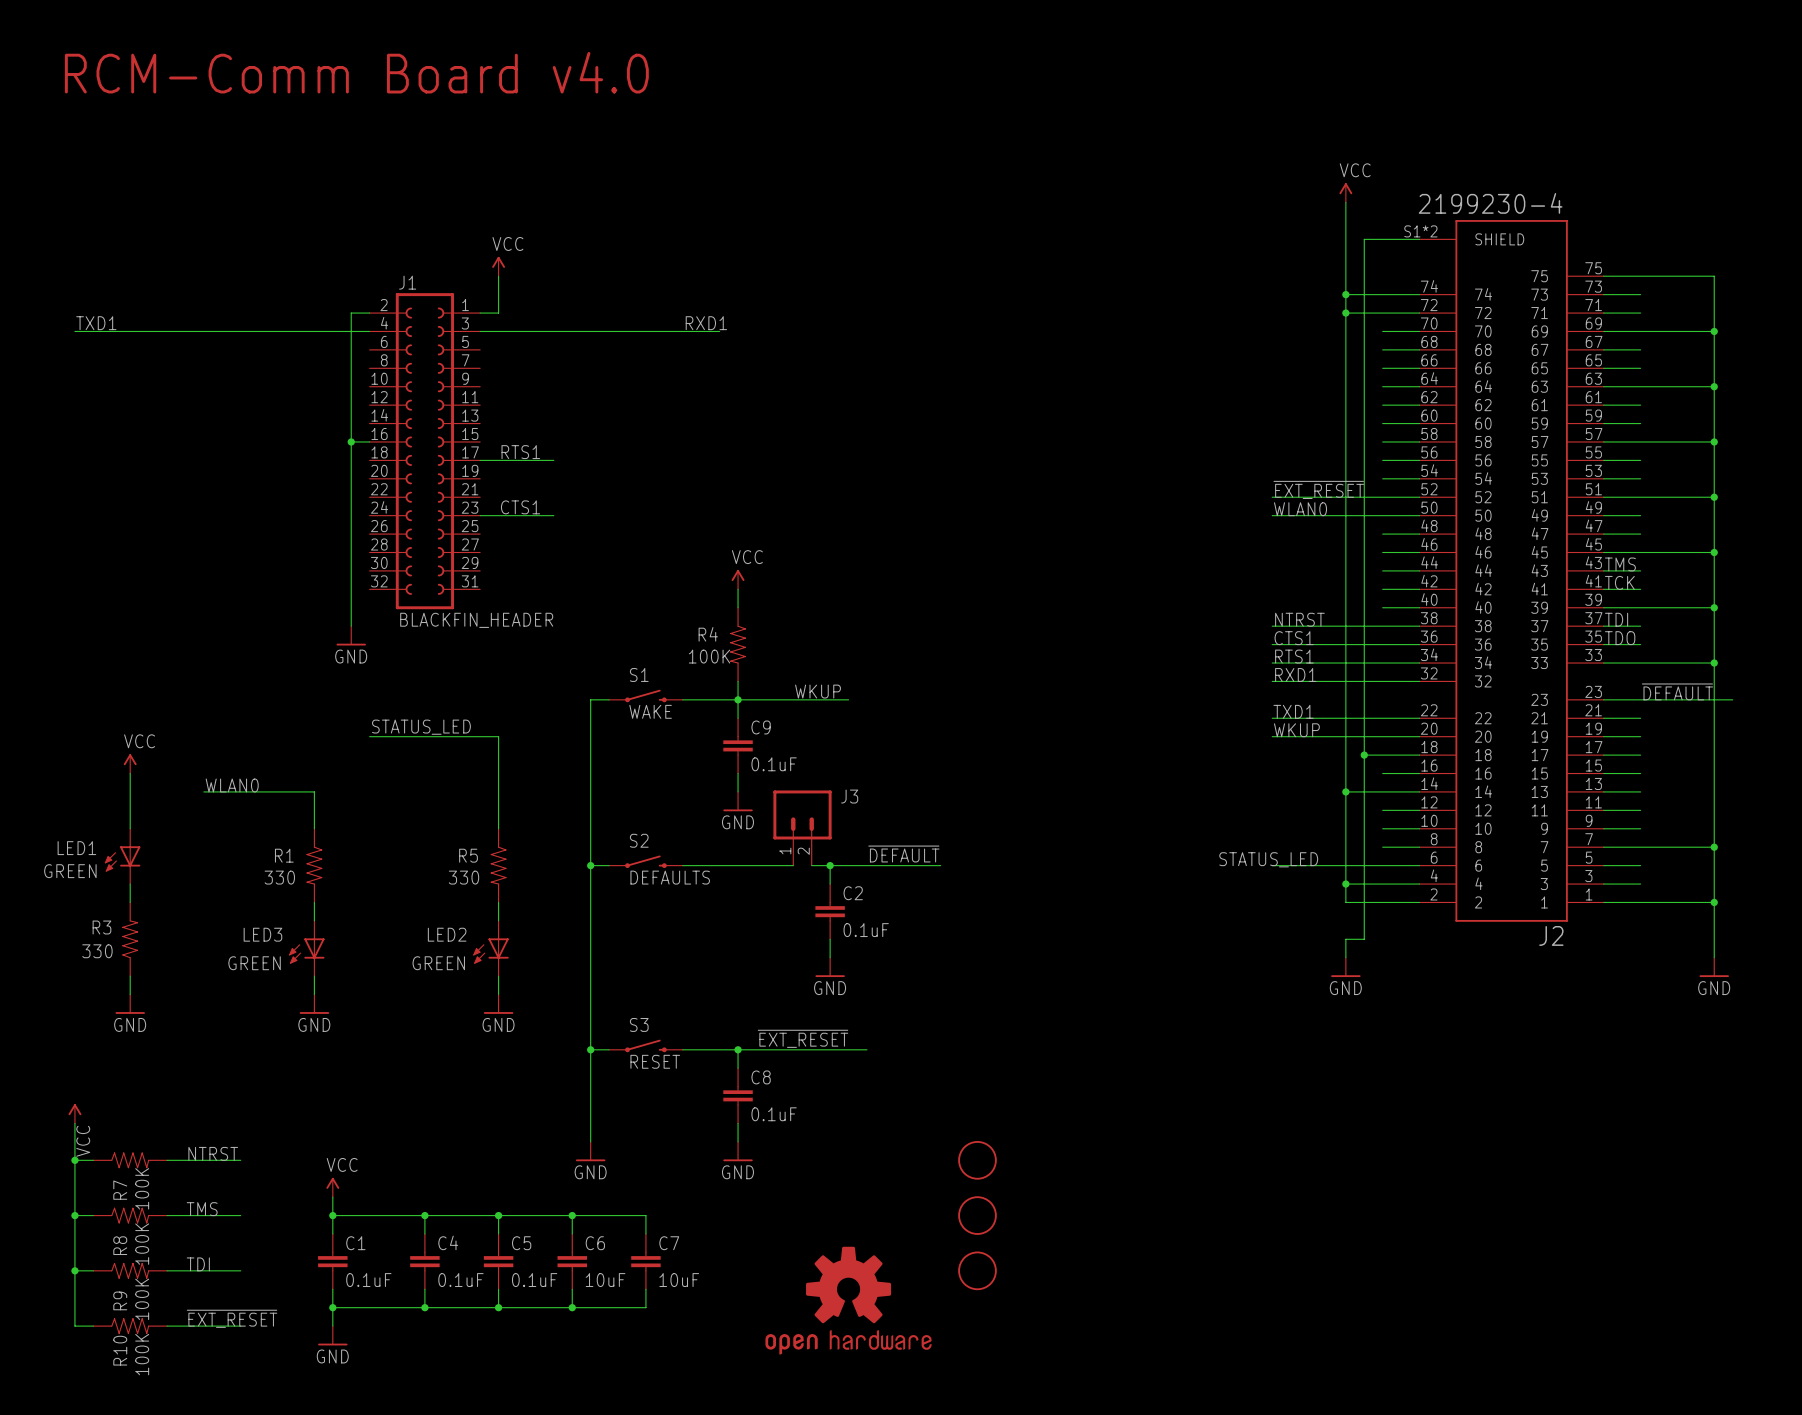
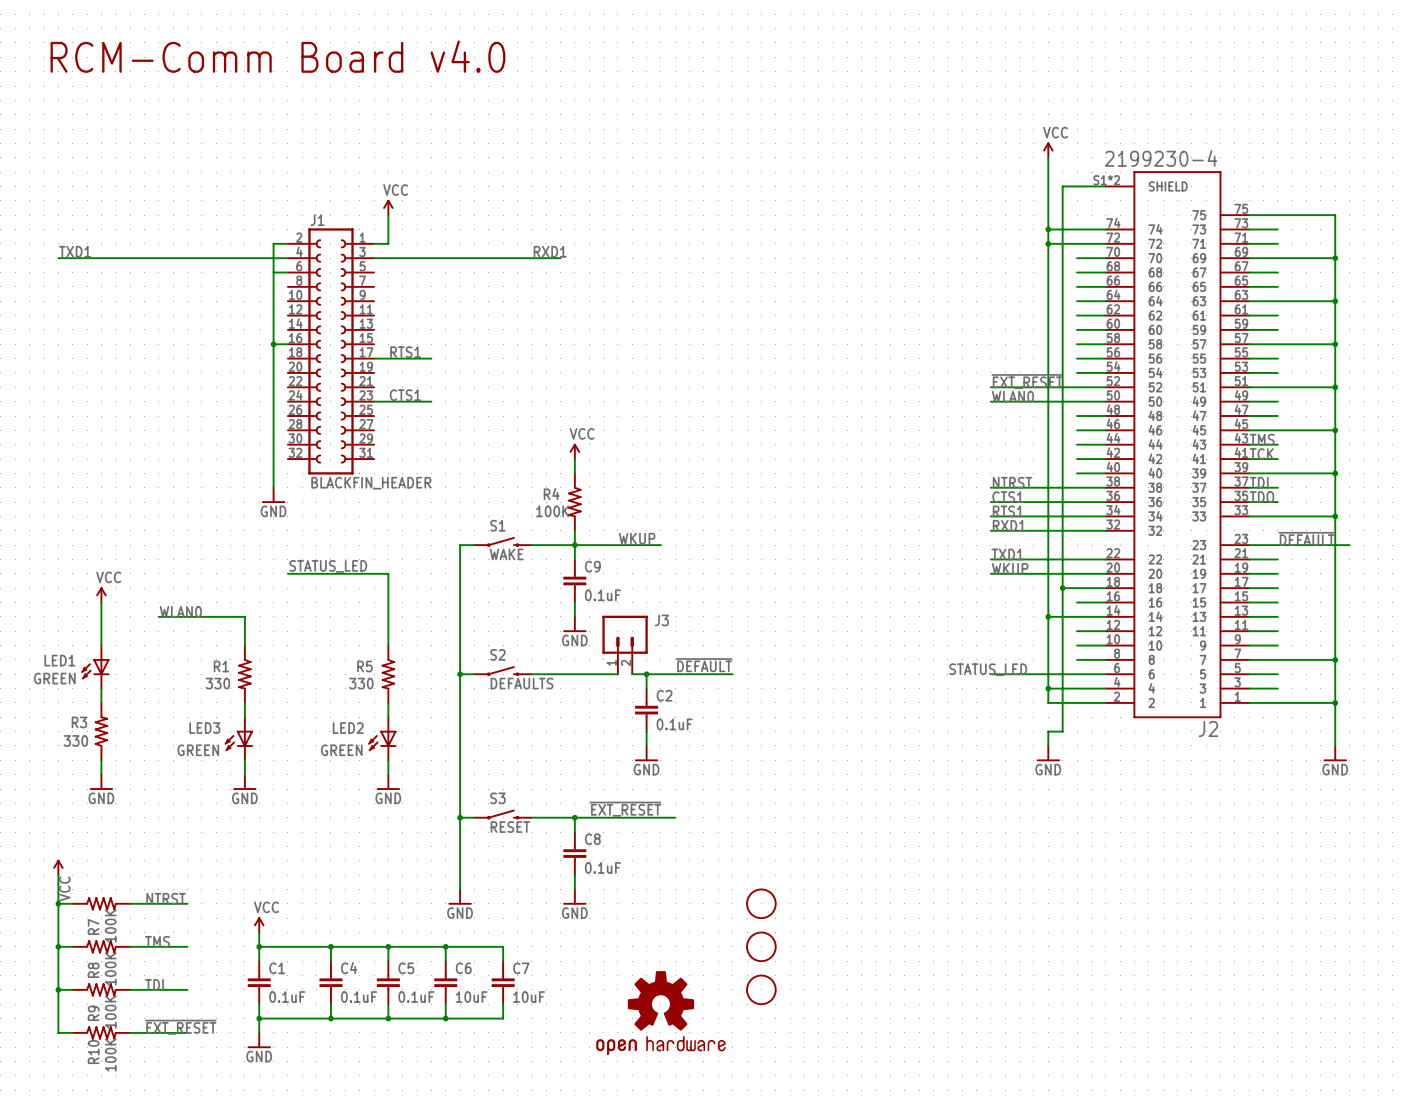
wire: none -> (273, 272) (287, 272)

